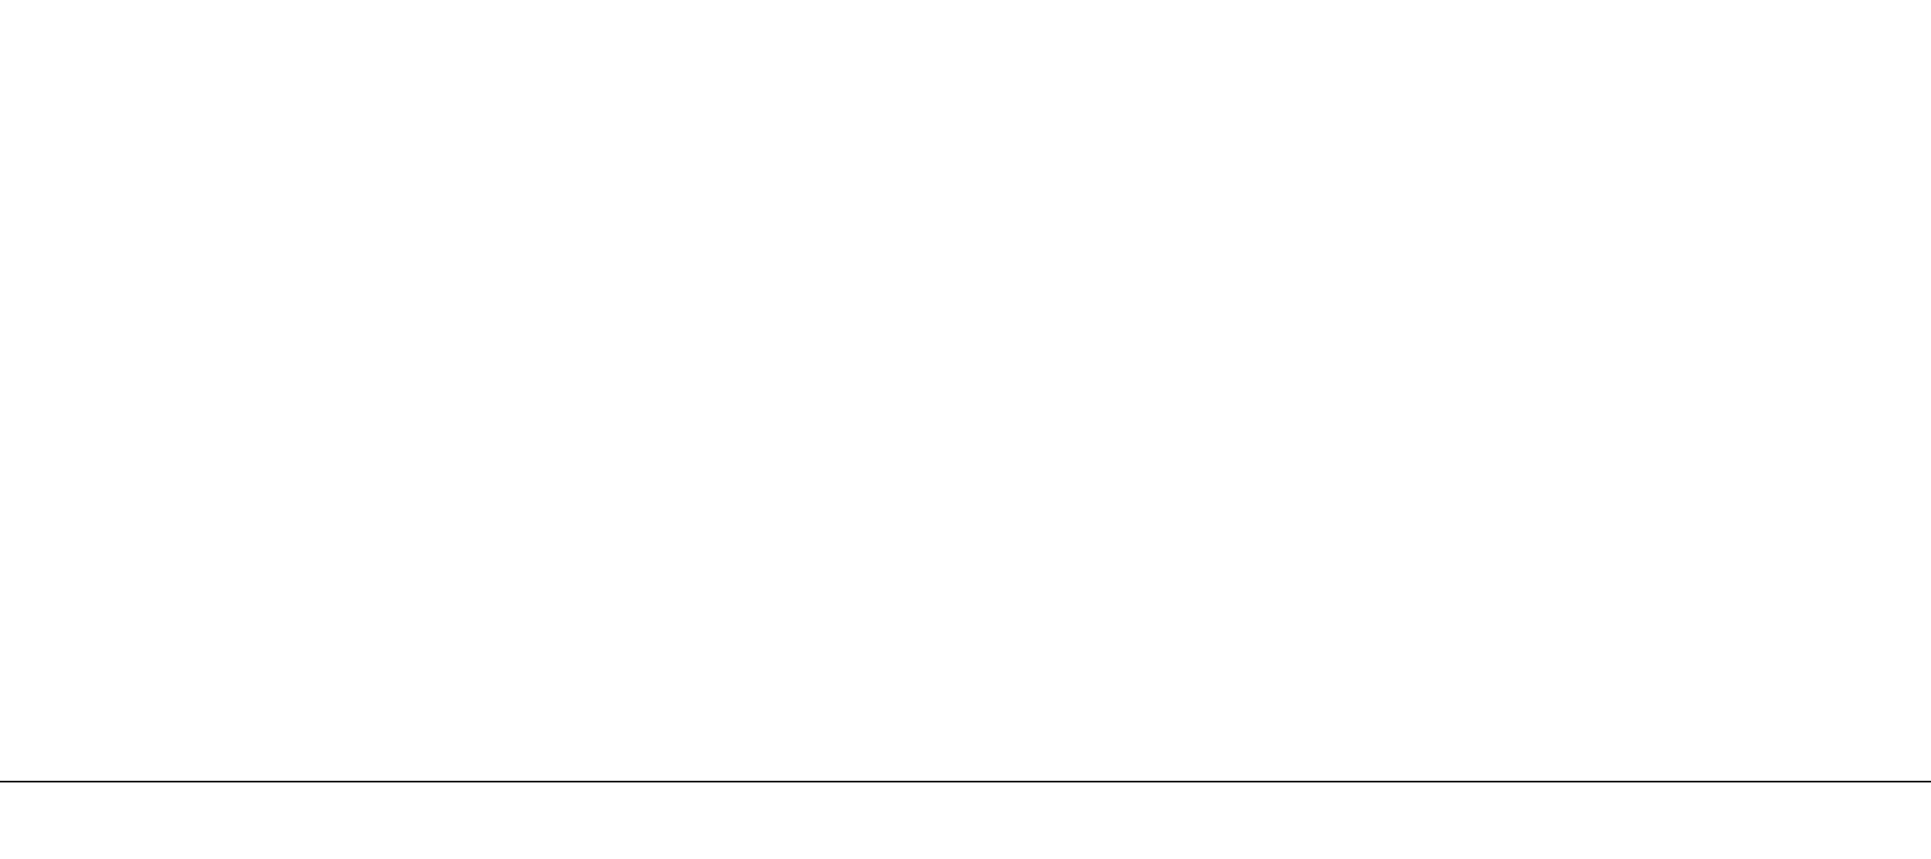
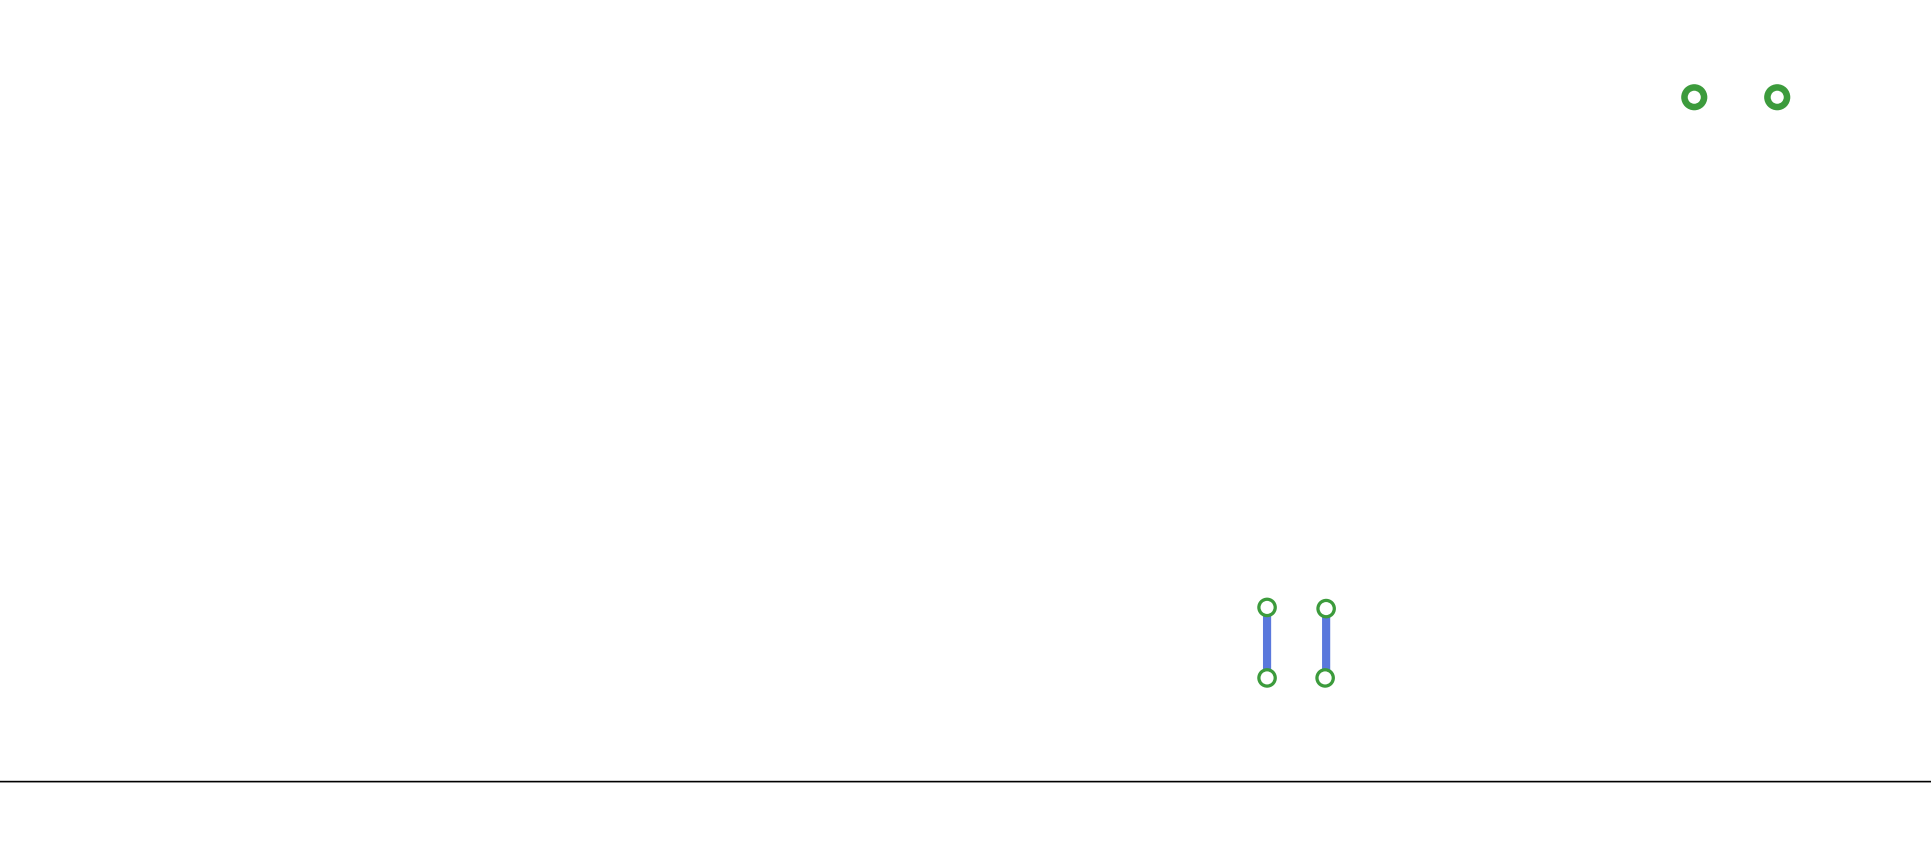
via: none -> (1694, 97)
via: none -> (1777, 97)
track: none -> (1267, 607) (1267, 677)
via: none -> (1267, 607)
track: none -> (1326, 608) (1325, 677)
via: none -> (1326, 608)
via: none -> (1267, 677)
via: none -> (1325, 677)

